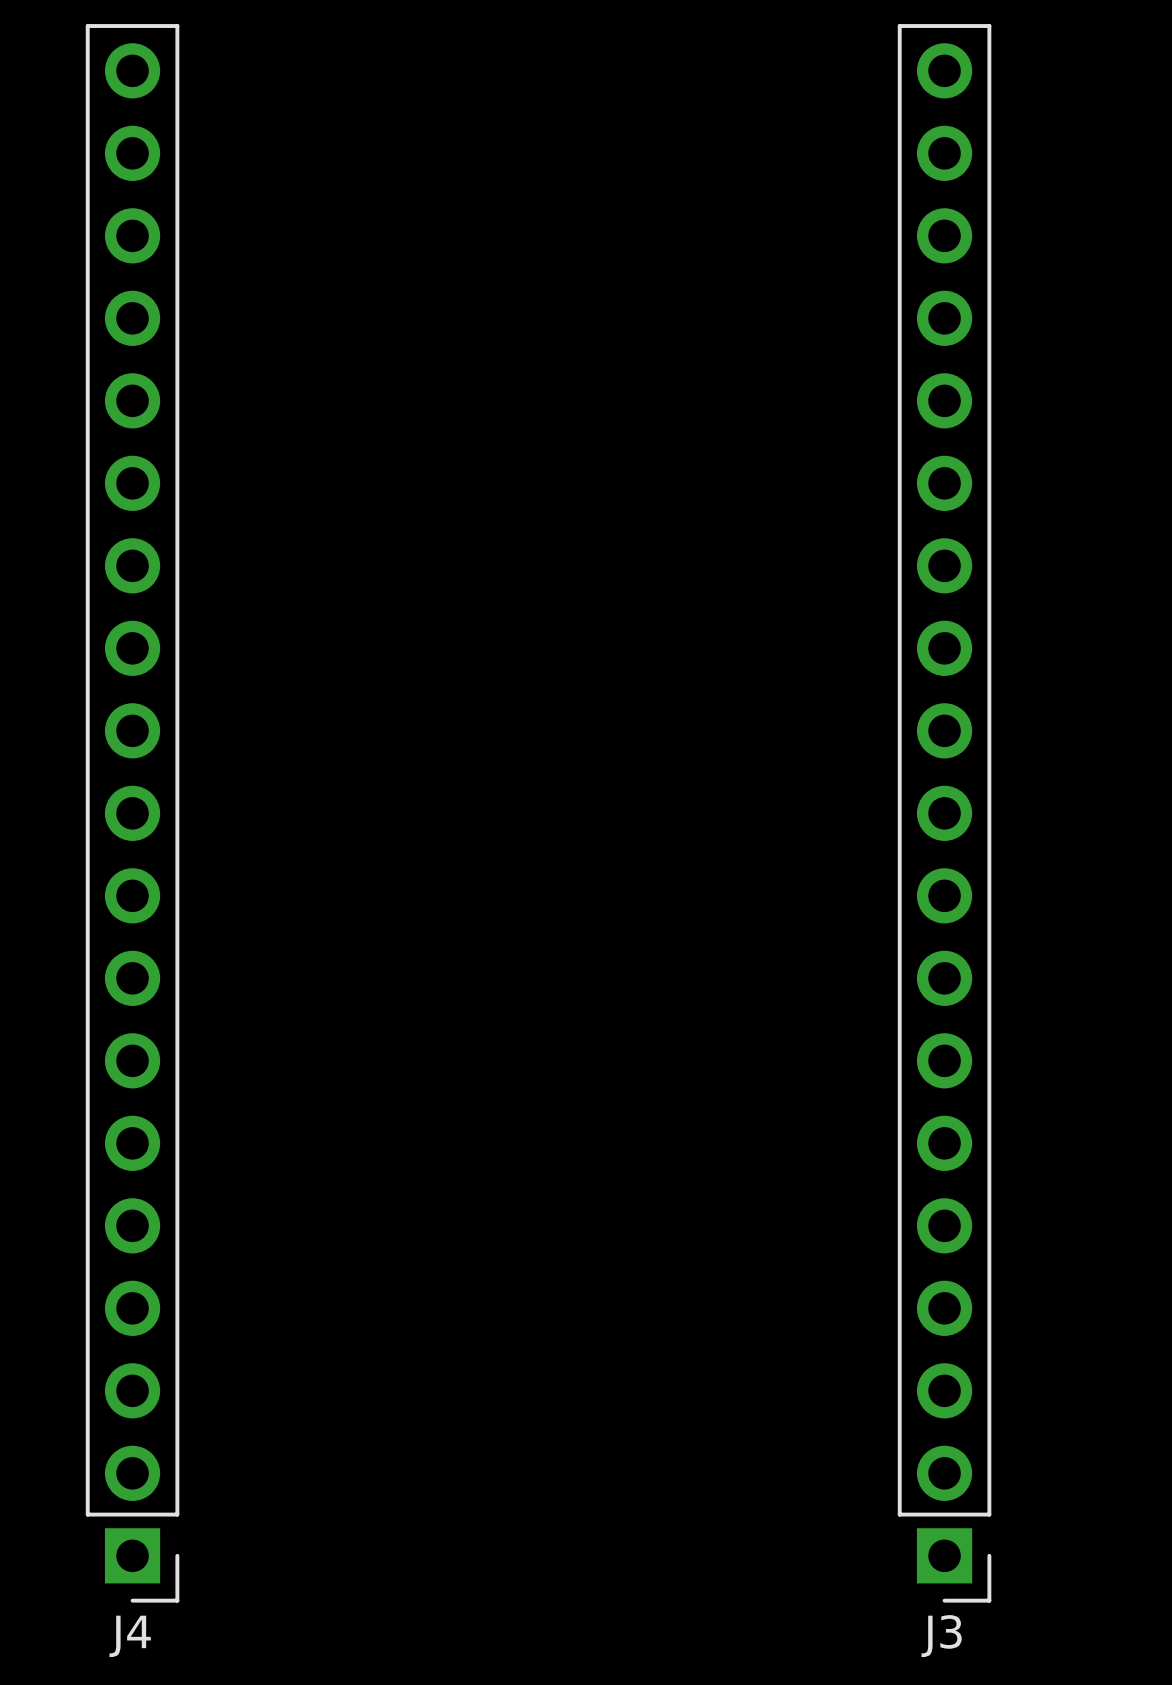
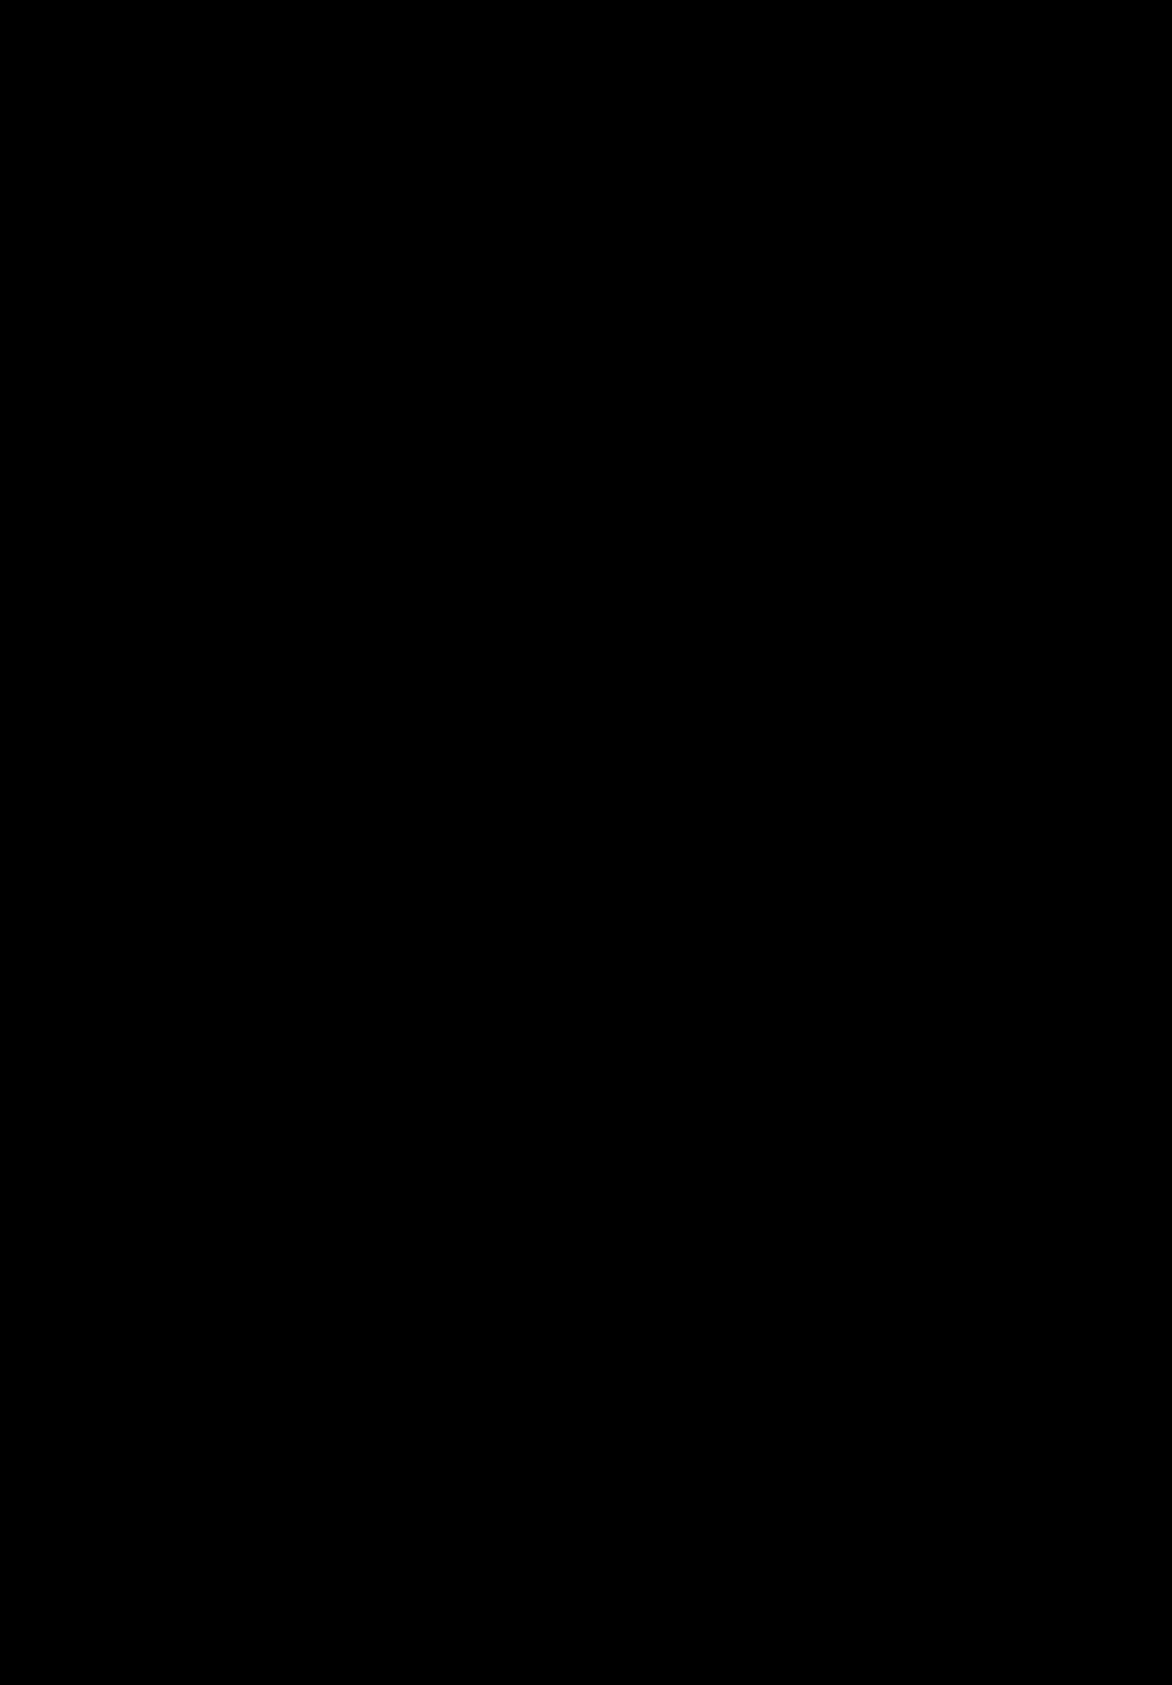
J4: (132, 813) -> none
J3: (944, 813) -> none

